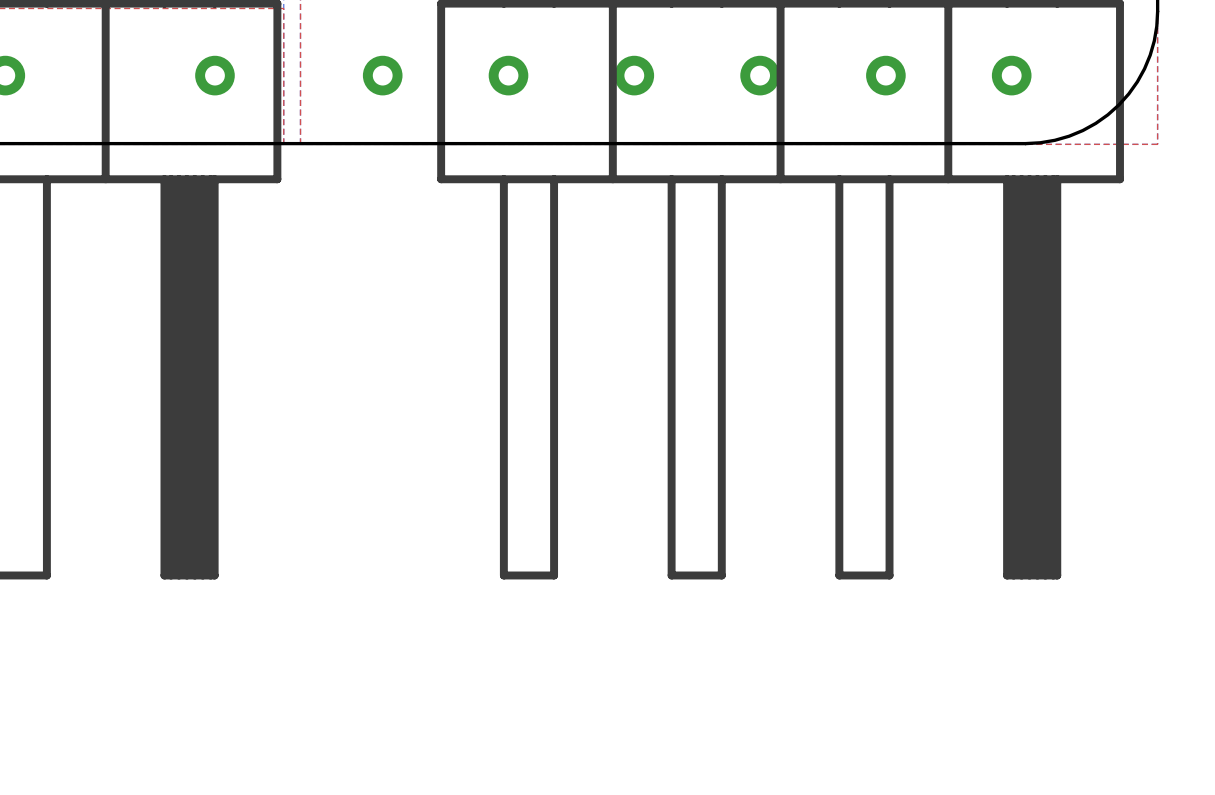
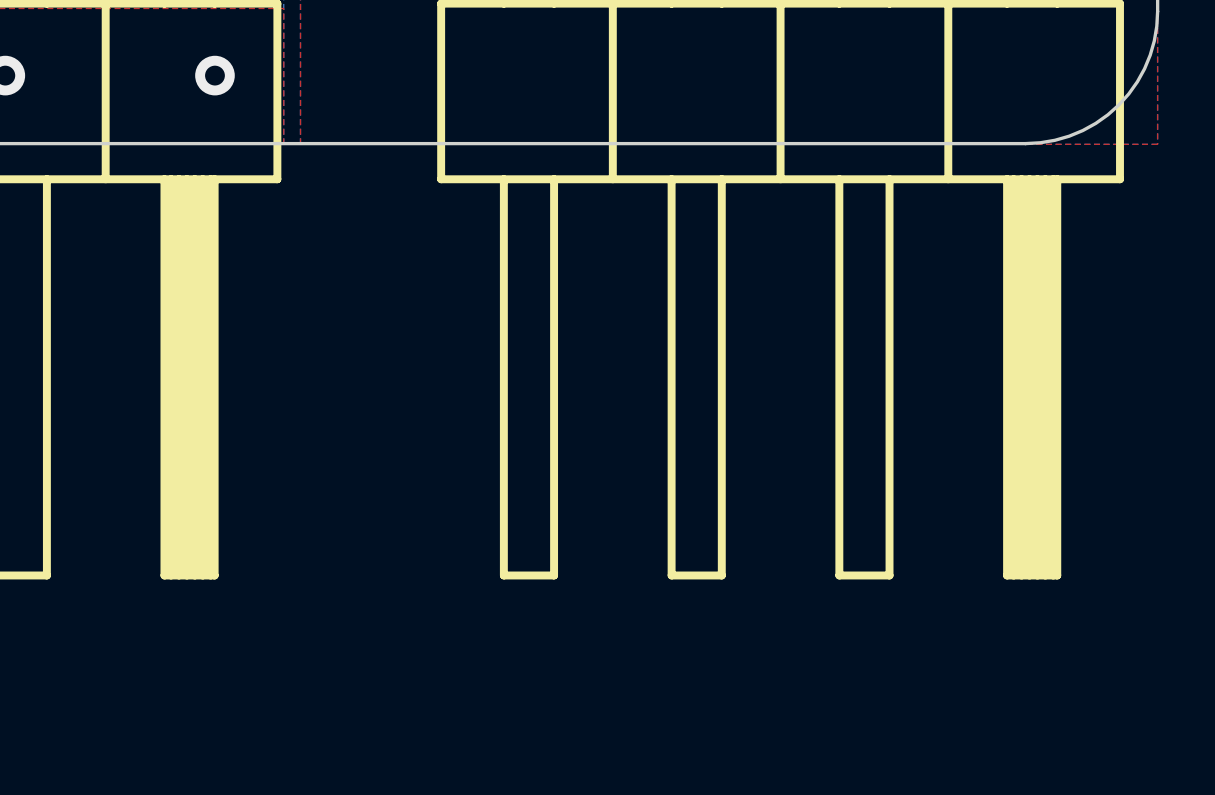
via: (382, 75) -> none
via: (508, 75) -> none
via: (634, 75) -> none
via: (760, 75) -> none
via: (885, 75) -> none
via: (1011, 75) -> none

